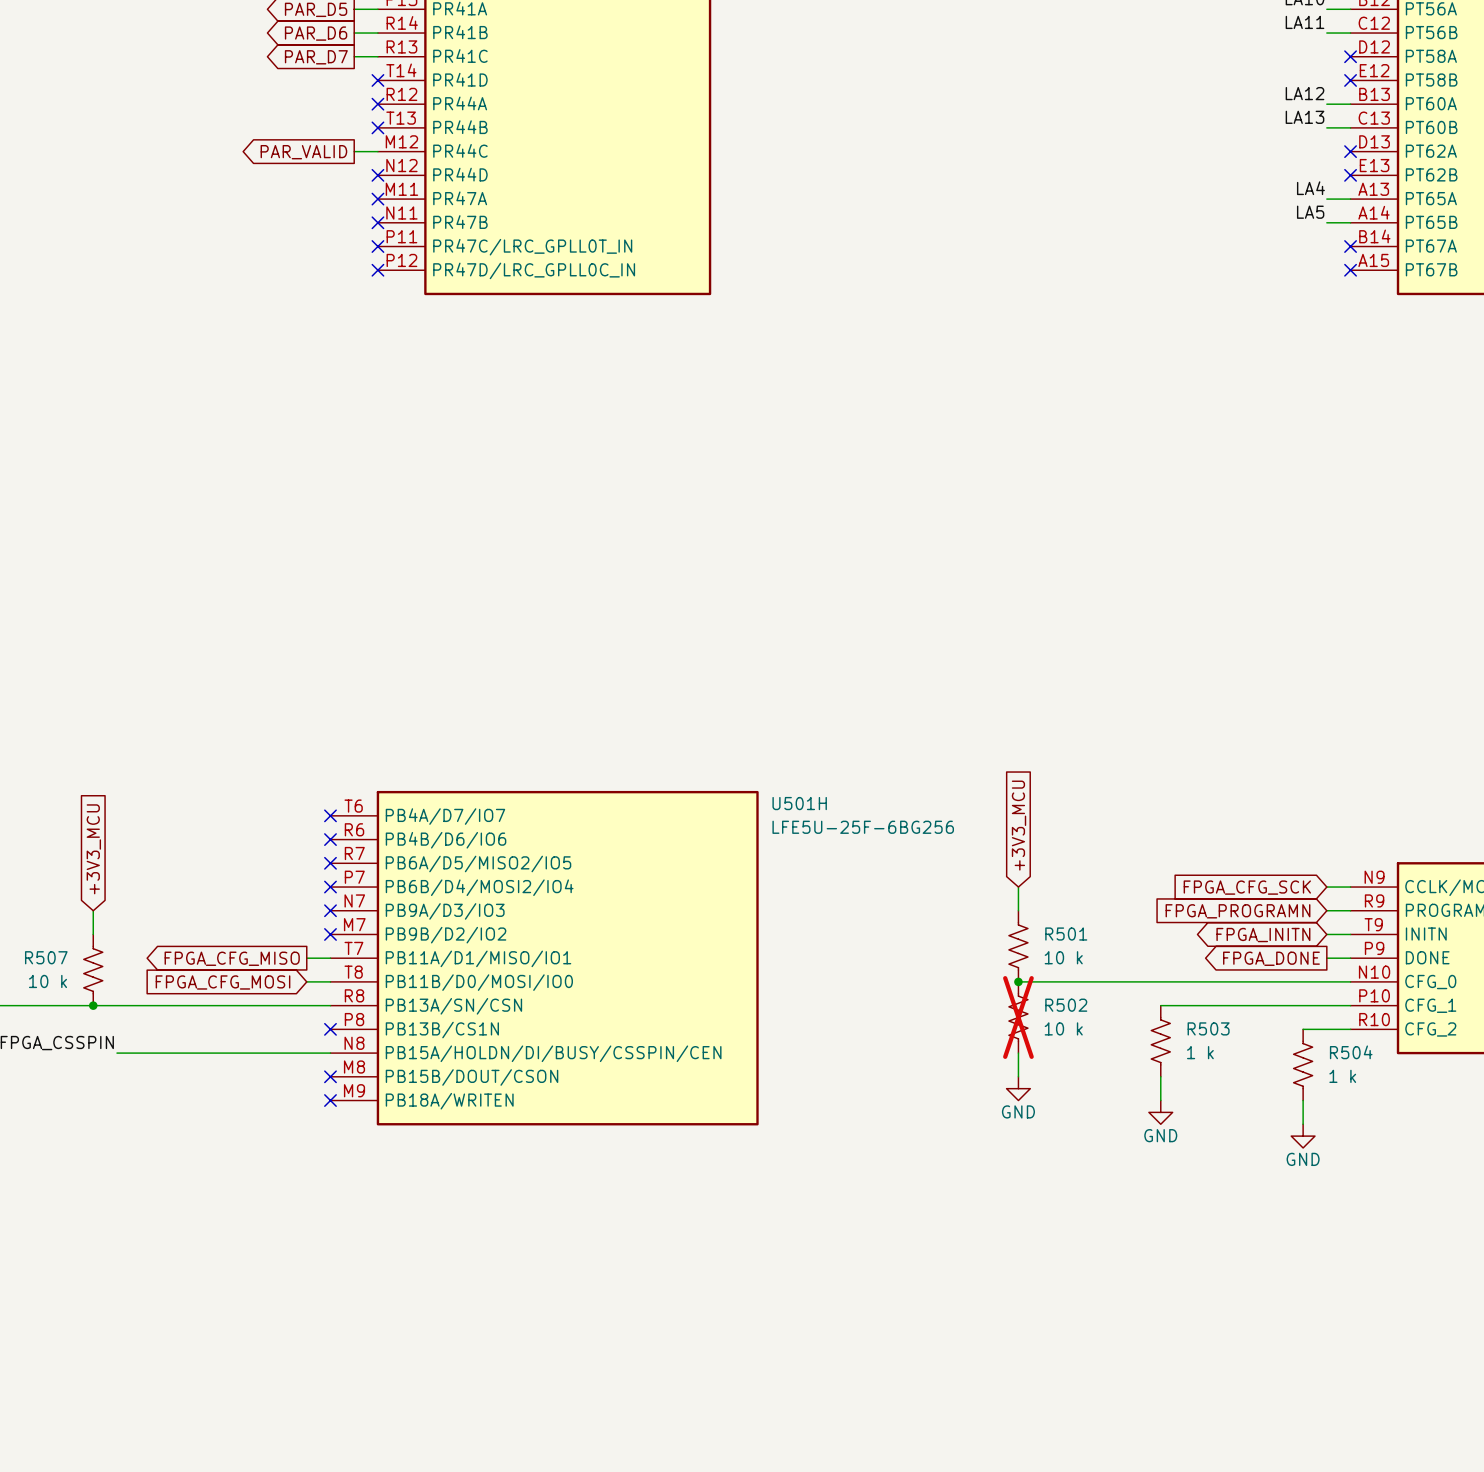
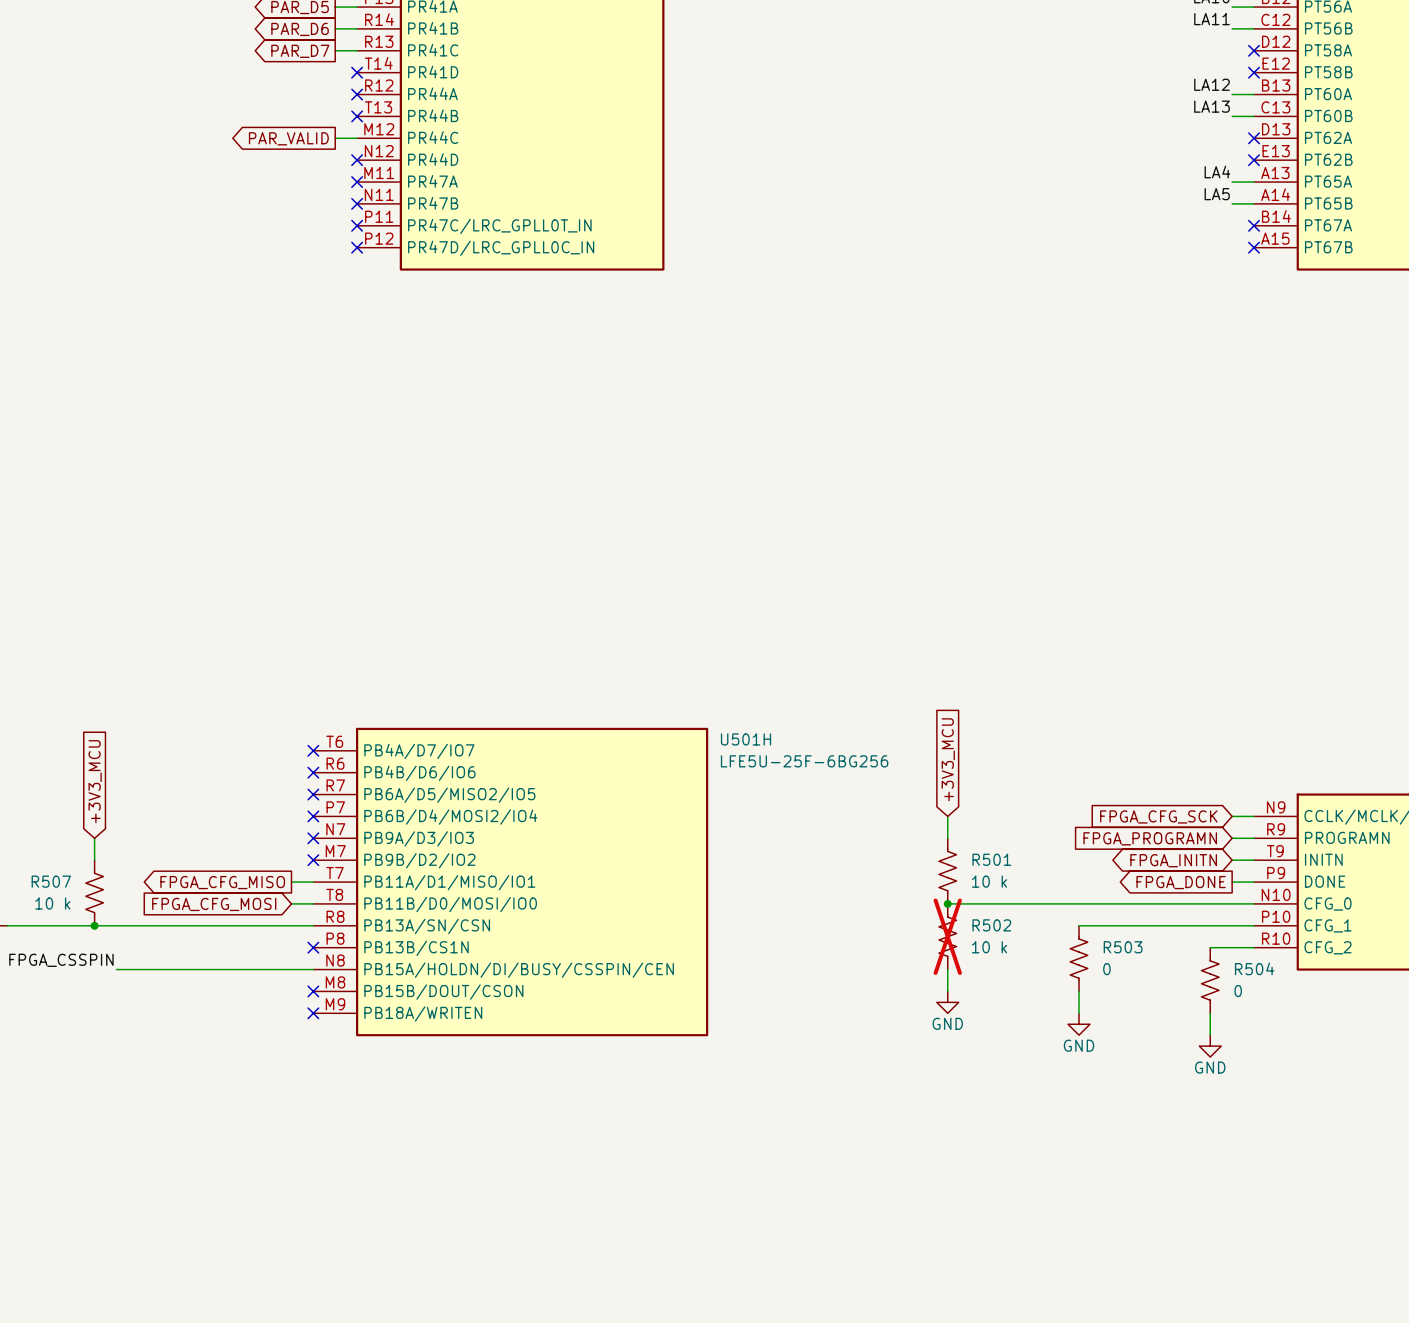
R503 value: 1 k (1200, 1052) -> 0 (1106, 969)
R504 value: 1 k (1342, 1076) -> 0 (1238, 991)

